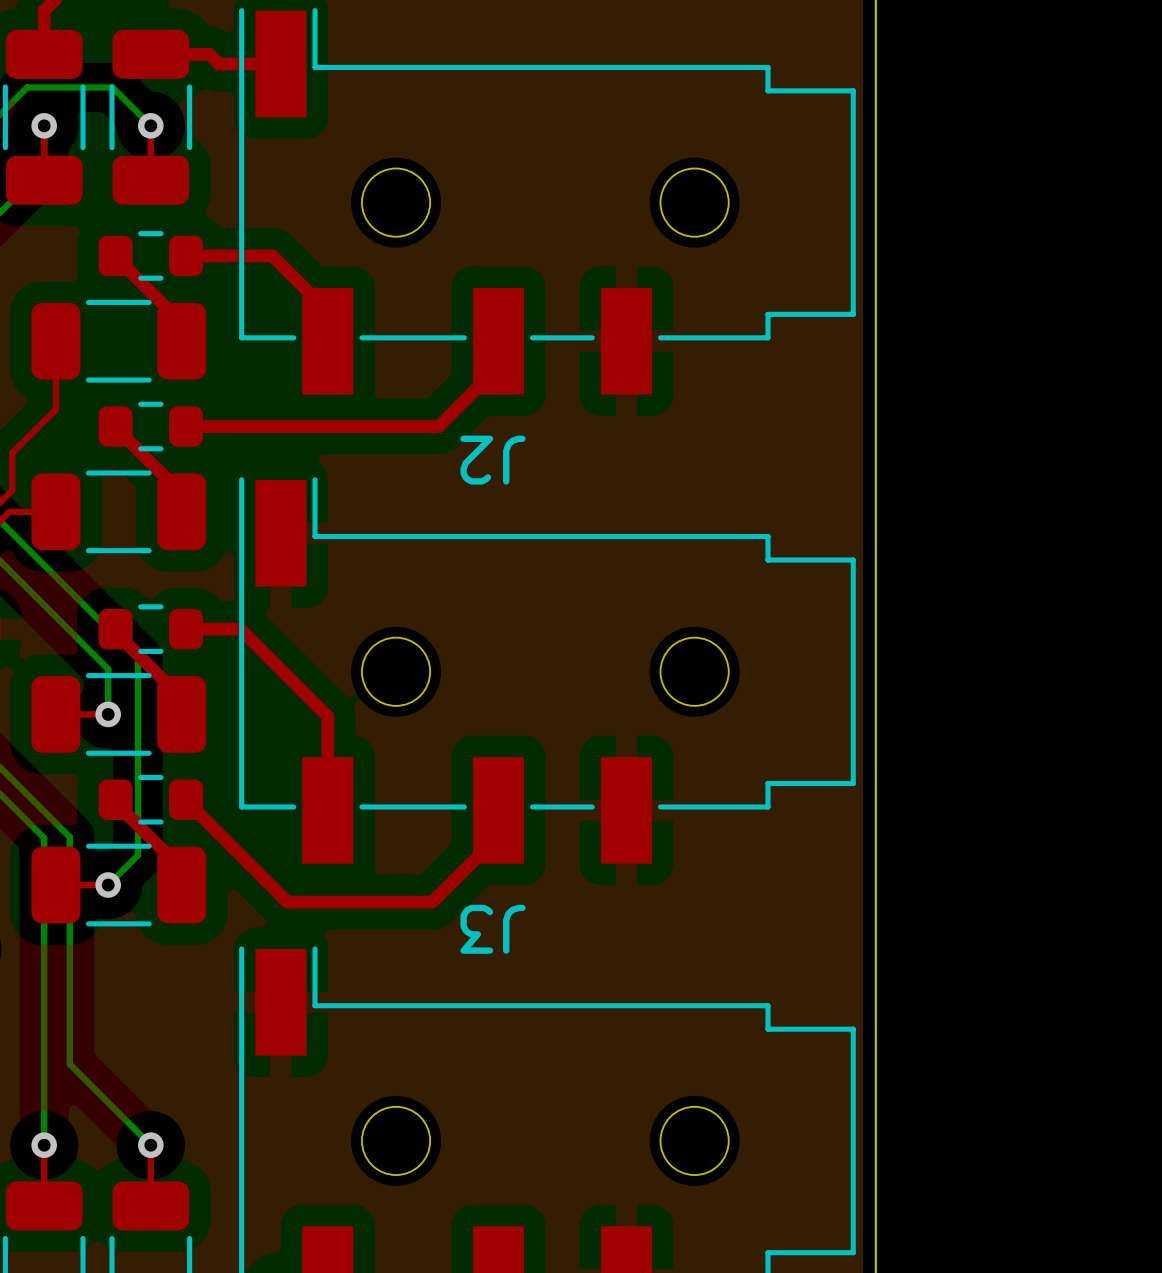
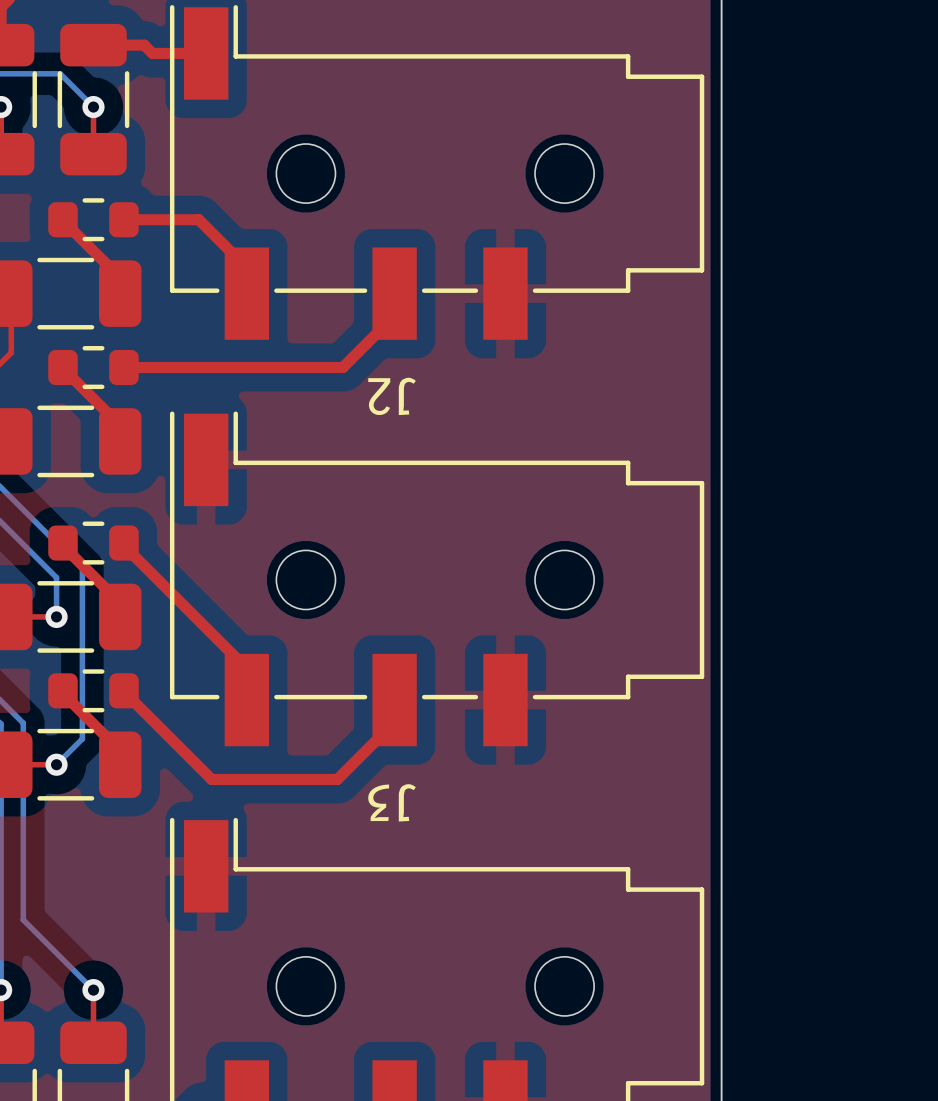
top track: (186, 629) (240, 629) (327, 716) (327, 774) -> (123, 543) (123, 545) (246, 668)

